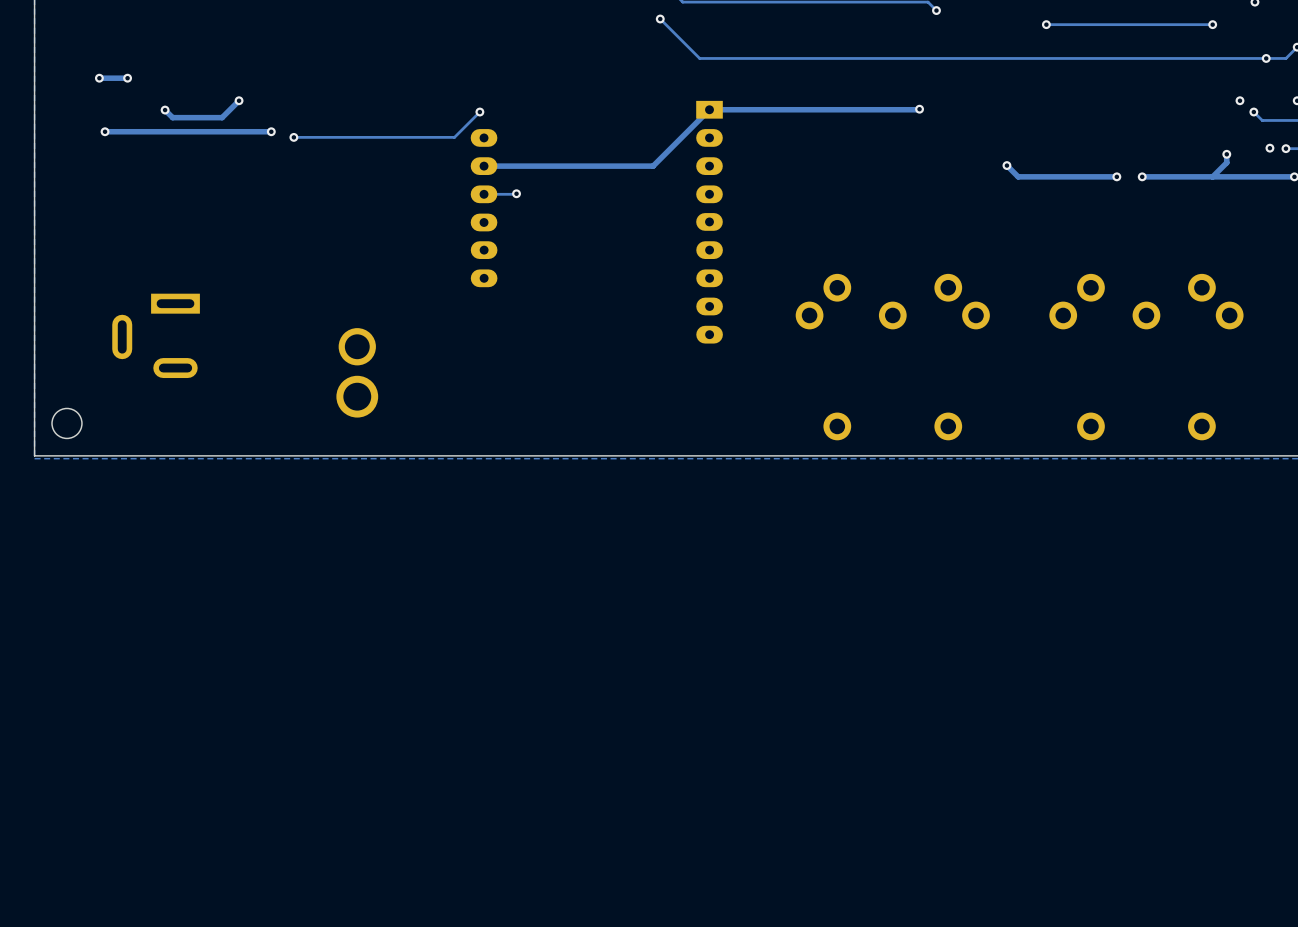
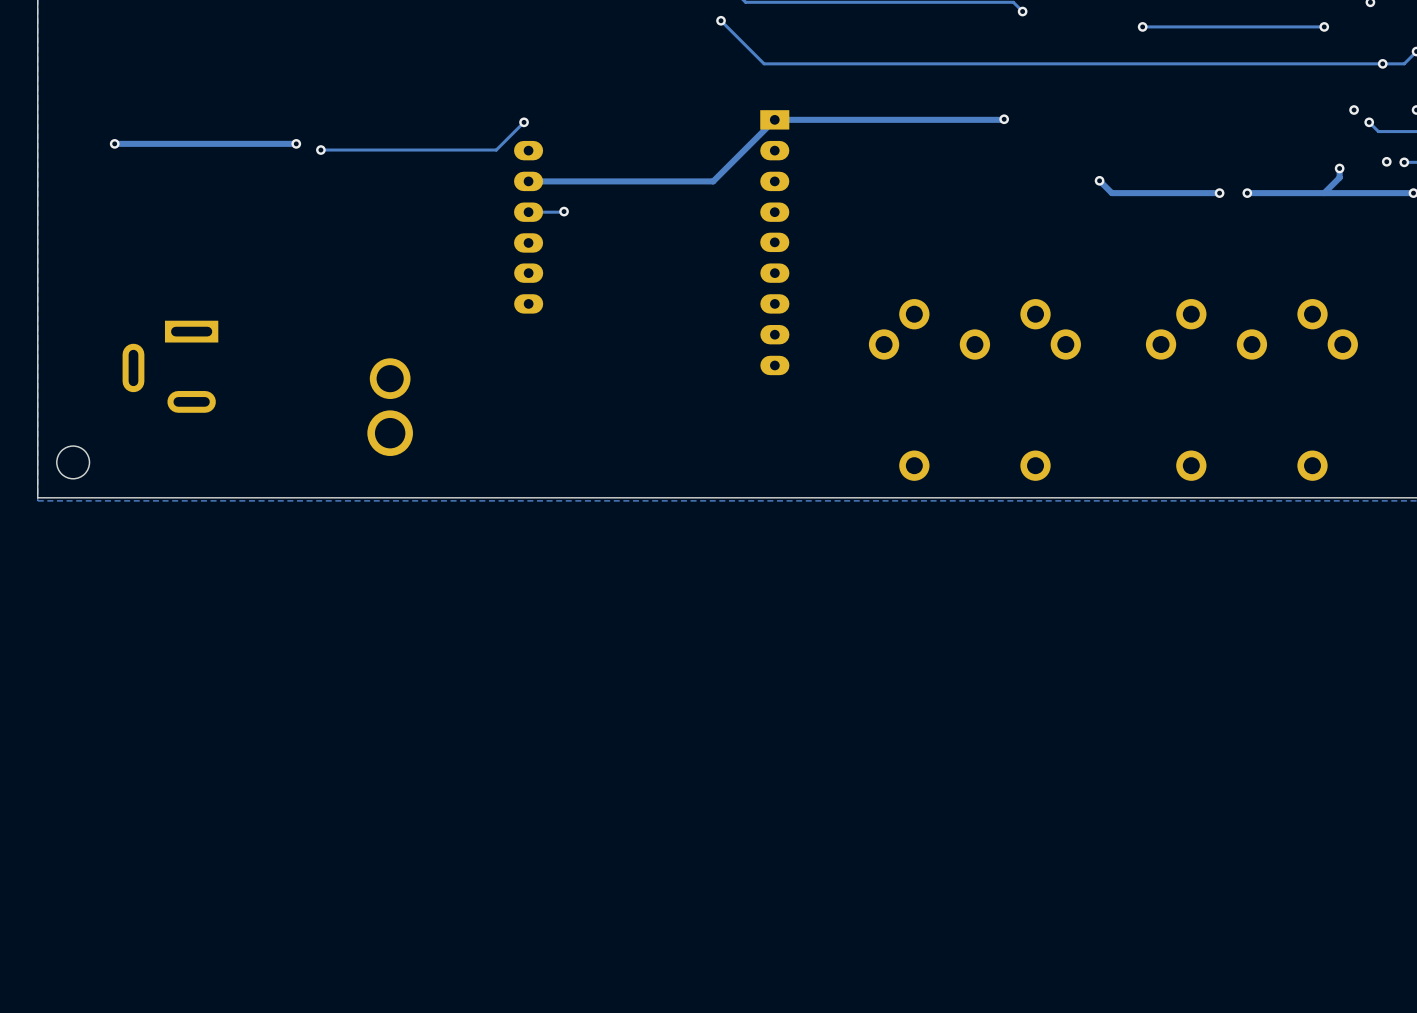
via: (99, 78) -> none
track: (127, 78) (99, 78) -> none
via: (127, 78) -> none
track: (239, 100) (222, 117) (172, 117) (165, 110) -> none
via: (239, 100) -> none
via: (165, 110) -> none

